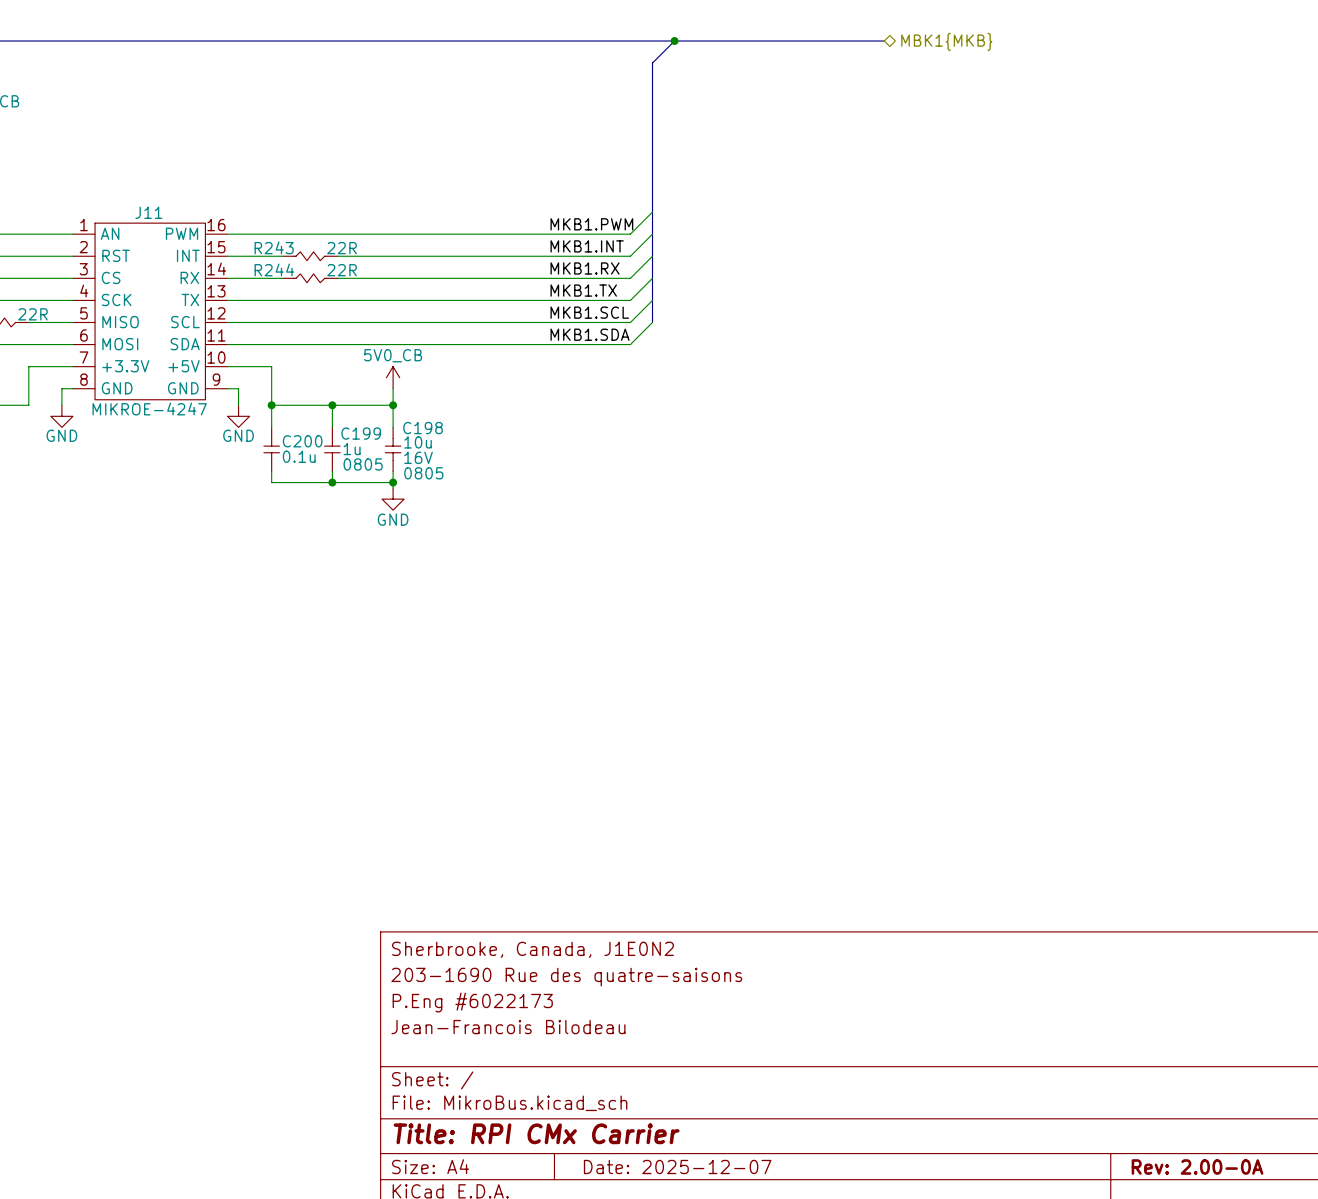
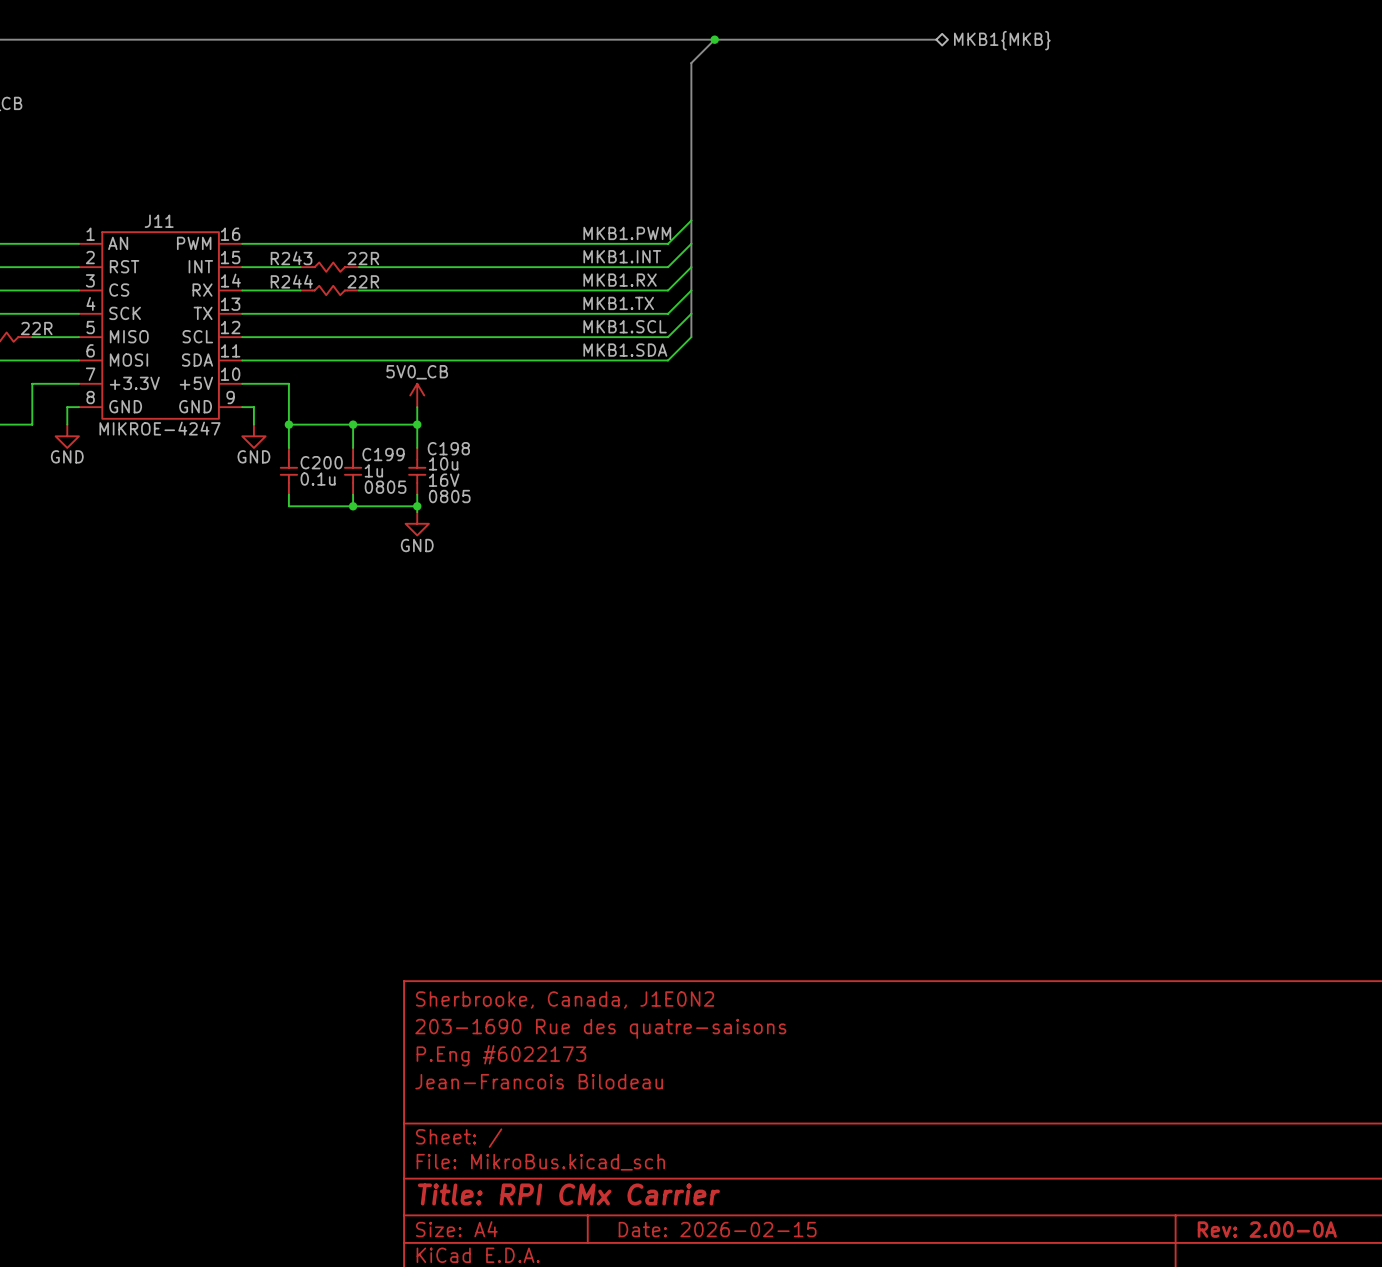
hierarchical label: MBK1{MKB} (946, 41) -> MKB1{MKB} (1002, 40)
title block: Date: 2025-12-07 (677, 1167) -> Date: 2026-02-15 (717, 1229)

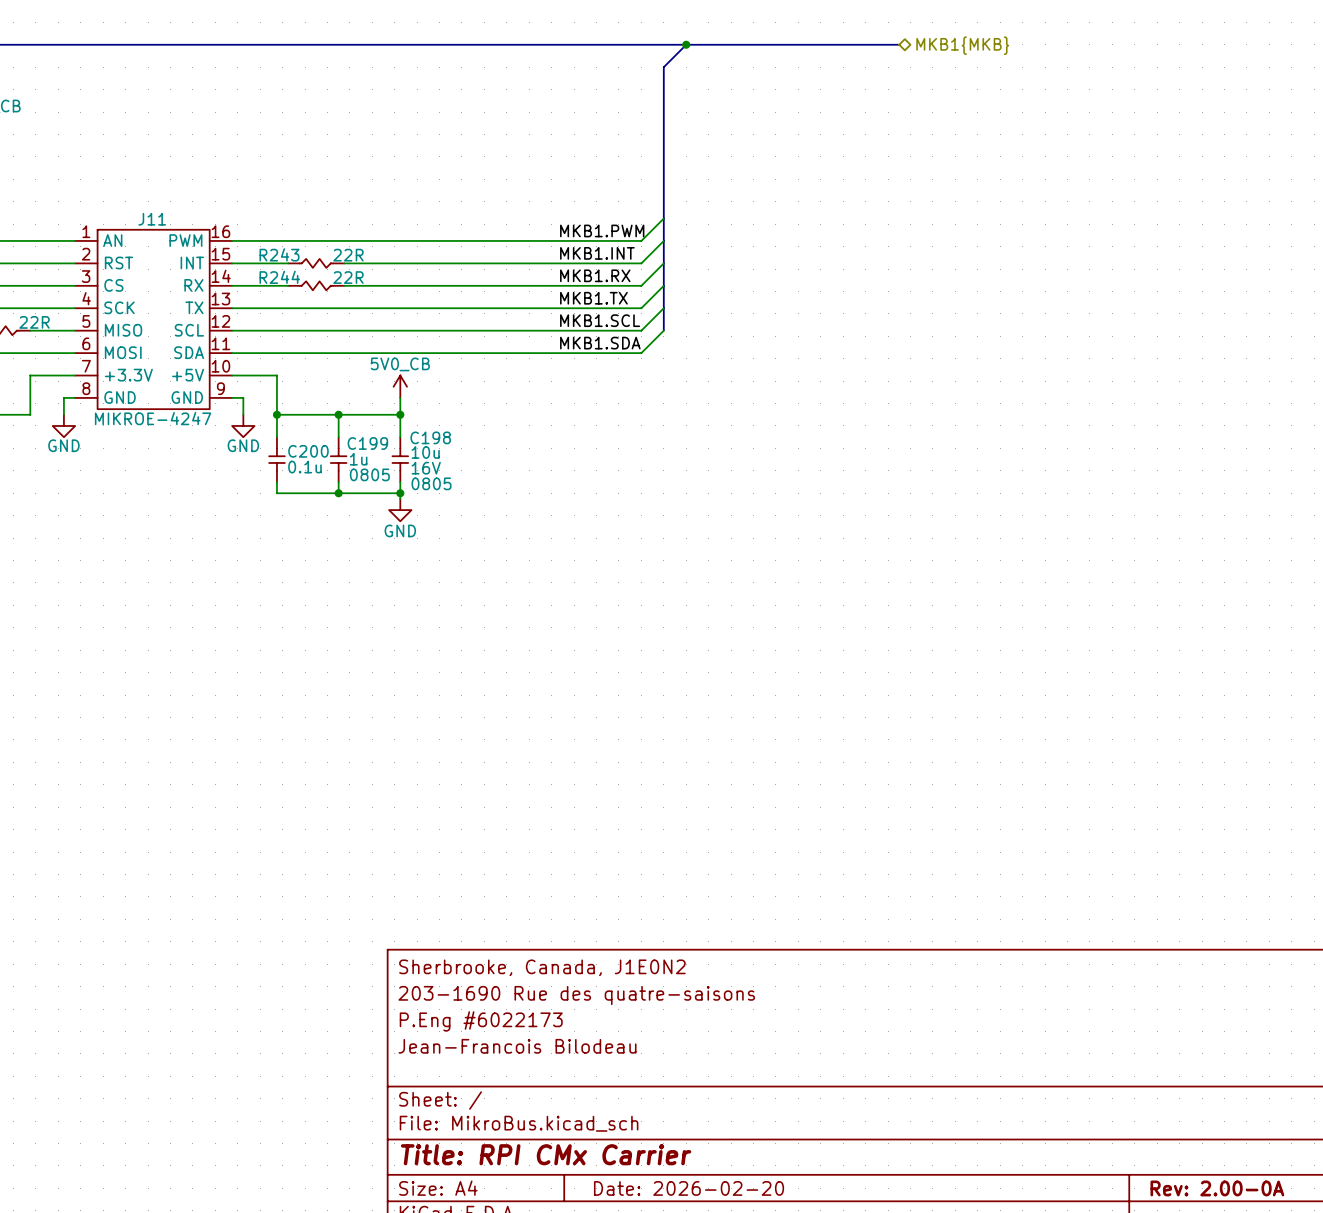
title block: Date: 2026-02-15 (717, 1229) -> Date: 2026-02-20 (689, 1188)

